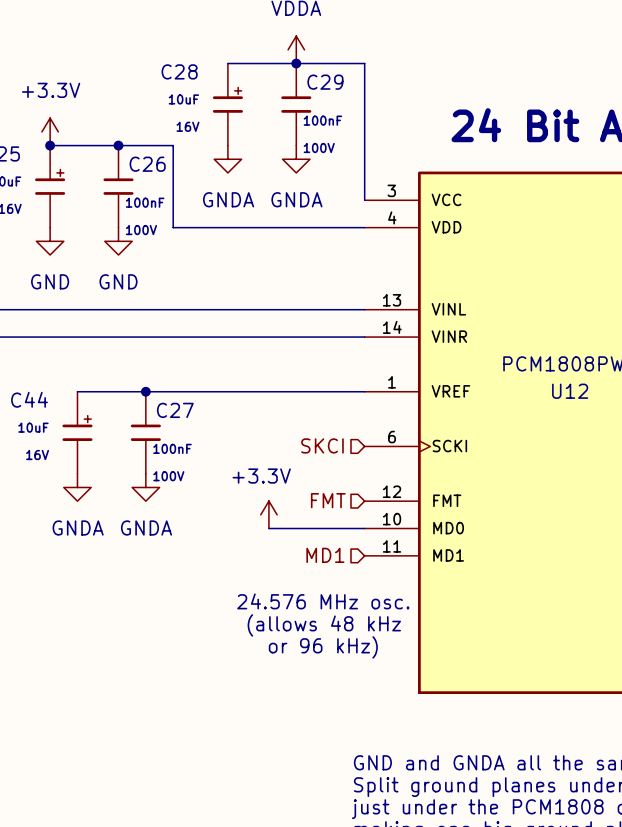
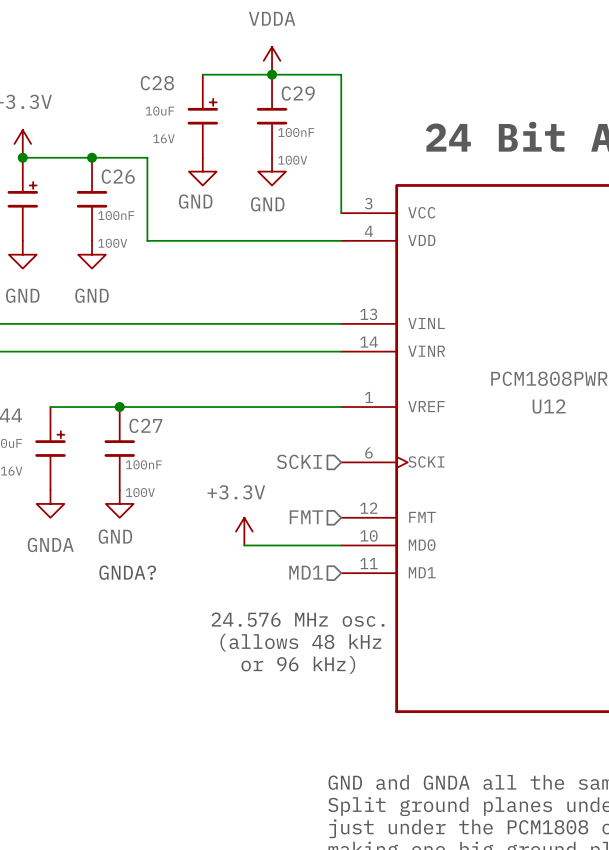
power symbol: GNDA (227, 159) -> GND (202, 171)
power symbol: GNDA (296, 159) -> GND (272, 171)
hierarchical label: SKCI (322, 445) -> SCKI (299, 461)
power symbol: GNDA (145, 487) -> GND (119, 503)
text: none -> GNDA? (127, 572)

